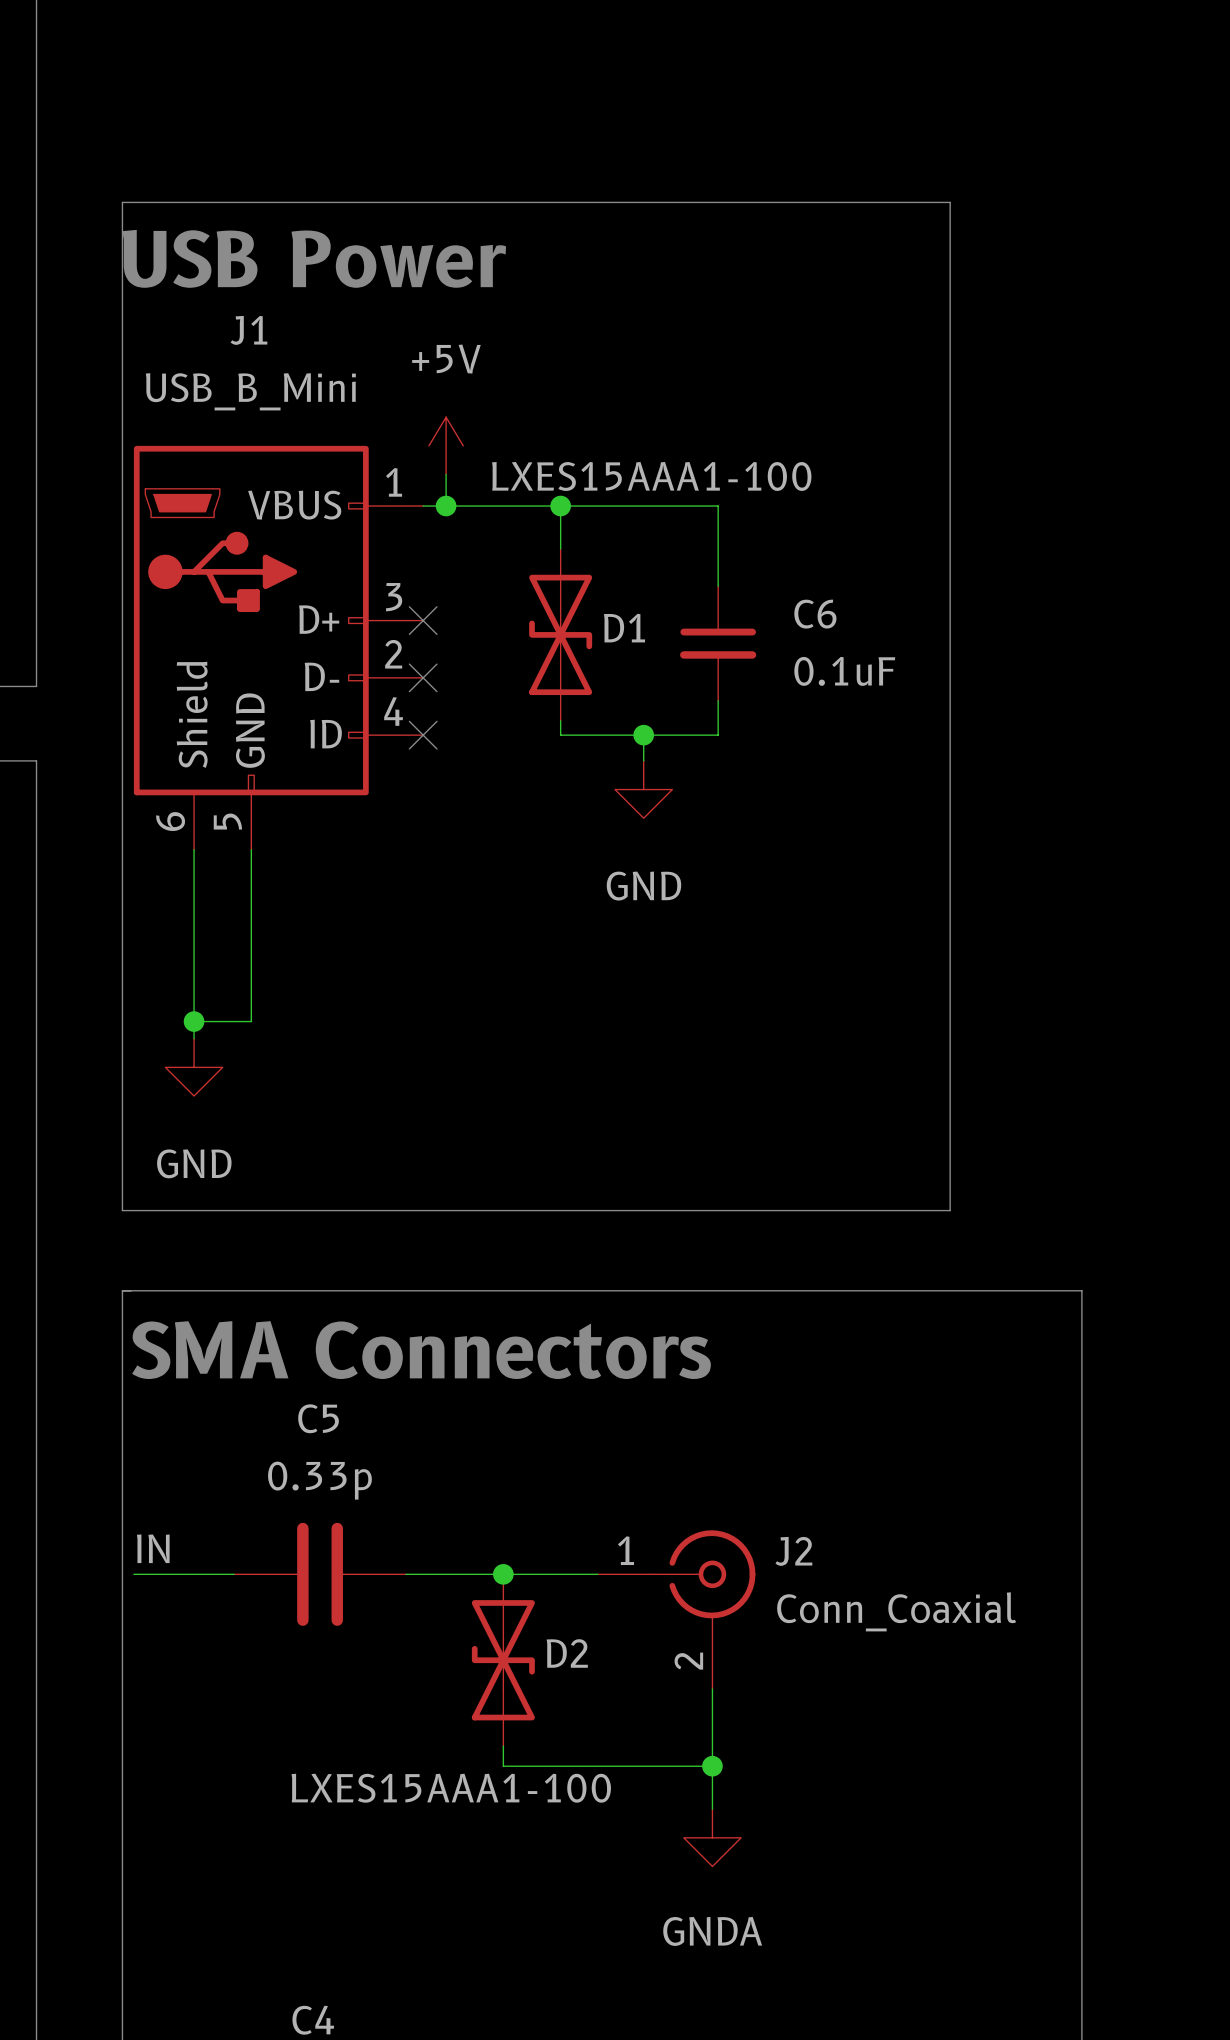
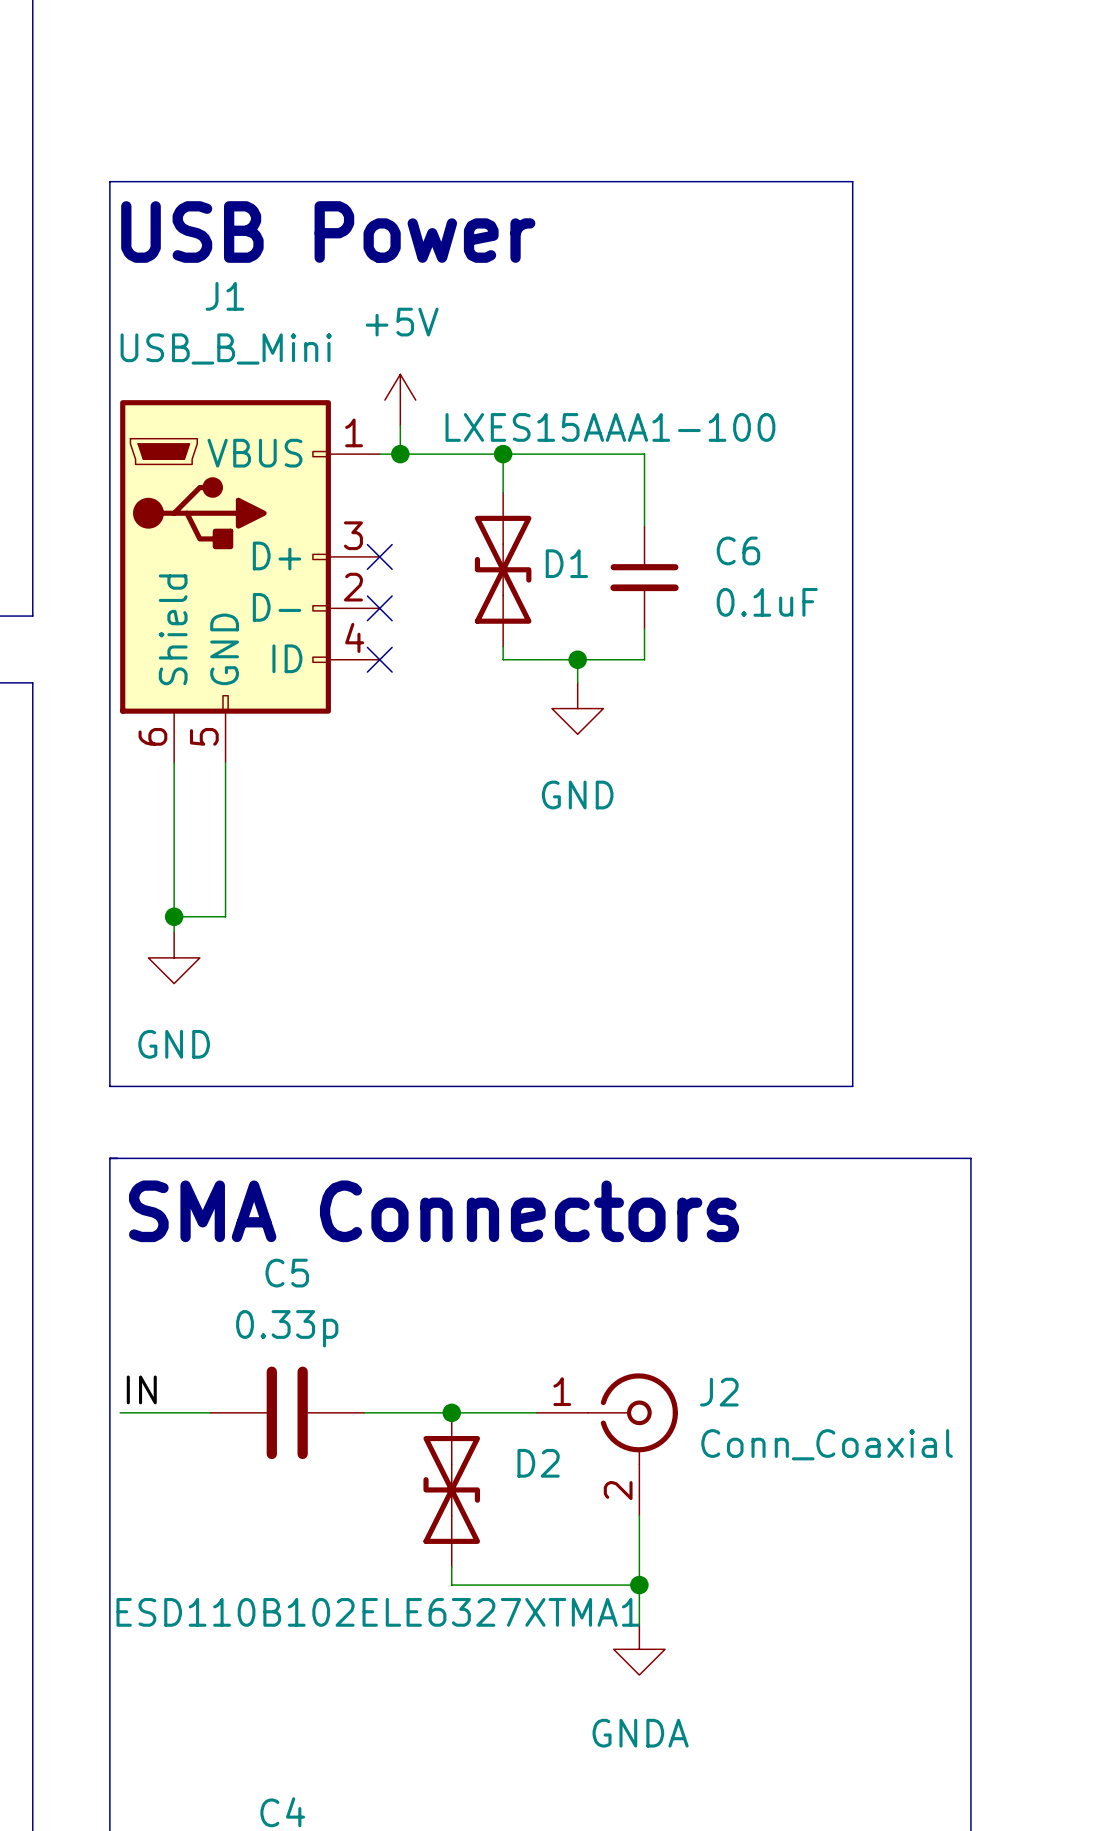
D2 name position: D2 (567, 1653) -> D2 (538, 1463)
D2 value: LXES15AAA1-100 (451, 1788) -> ESD110B102ELE6327XTMA1 (378, 1612)

